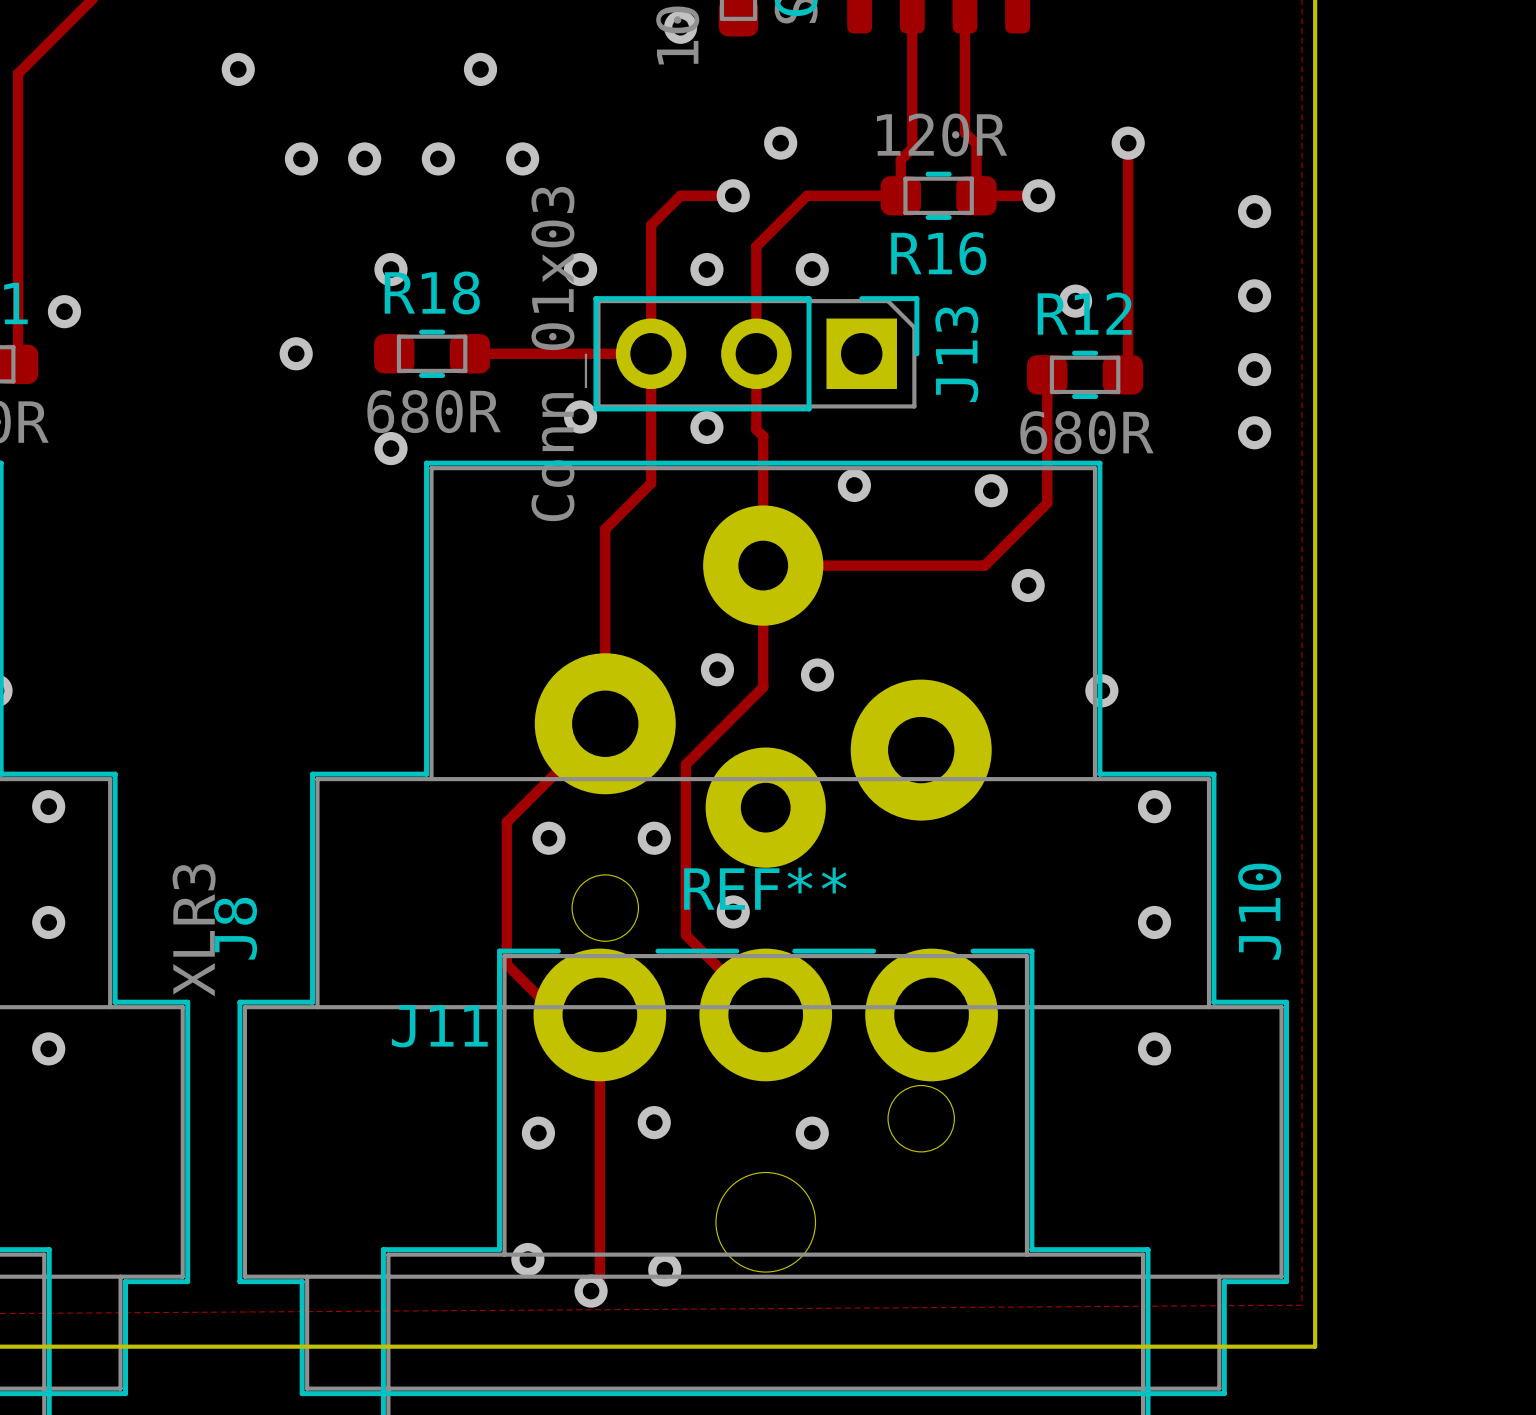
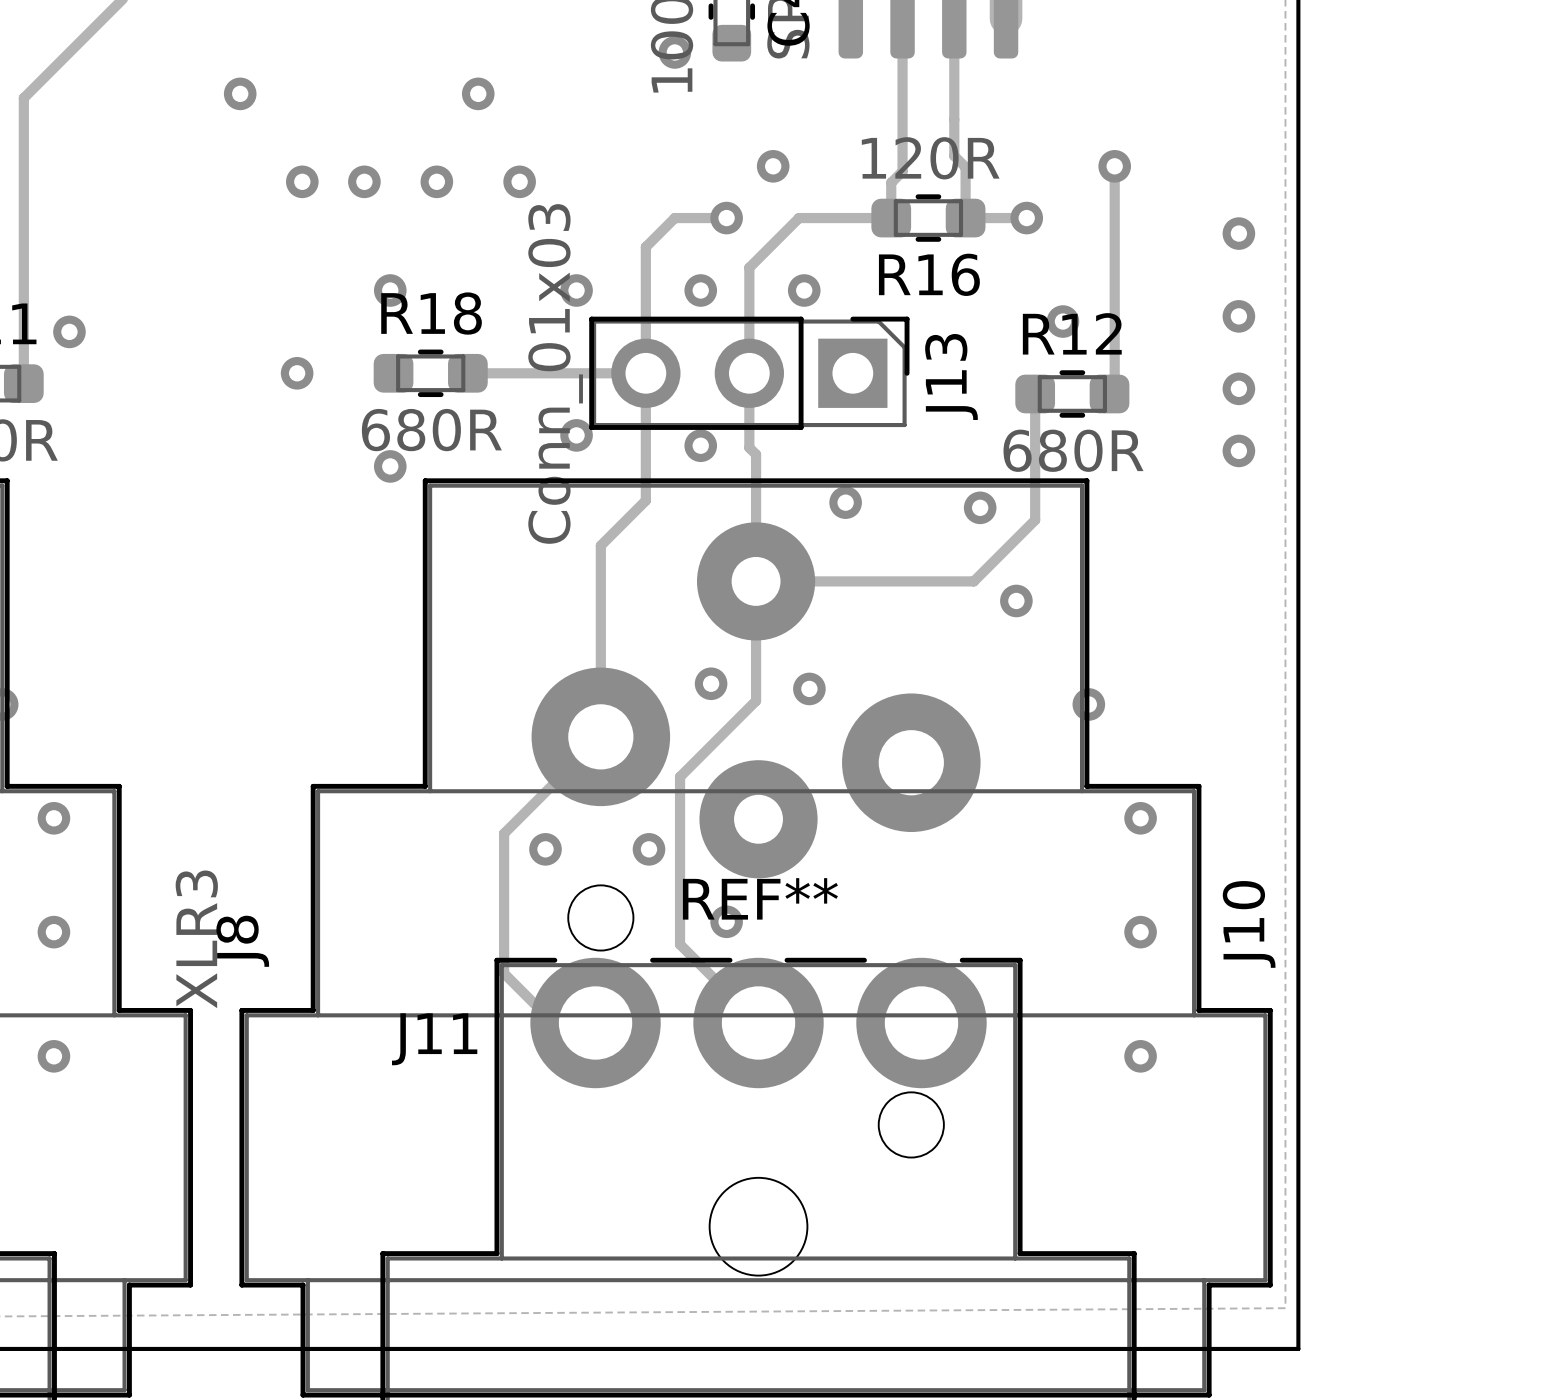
track: (599, 1014) (599, 1282) (591, 1291) -> none
via: (654, 1122) -> none
via: (538, 1133) -> none
via: (812, 1133) -> none
via: (527, 1259) -> none
via: (664, 1270) -> none
via: (591, 1291) -> none

